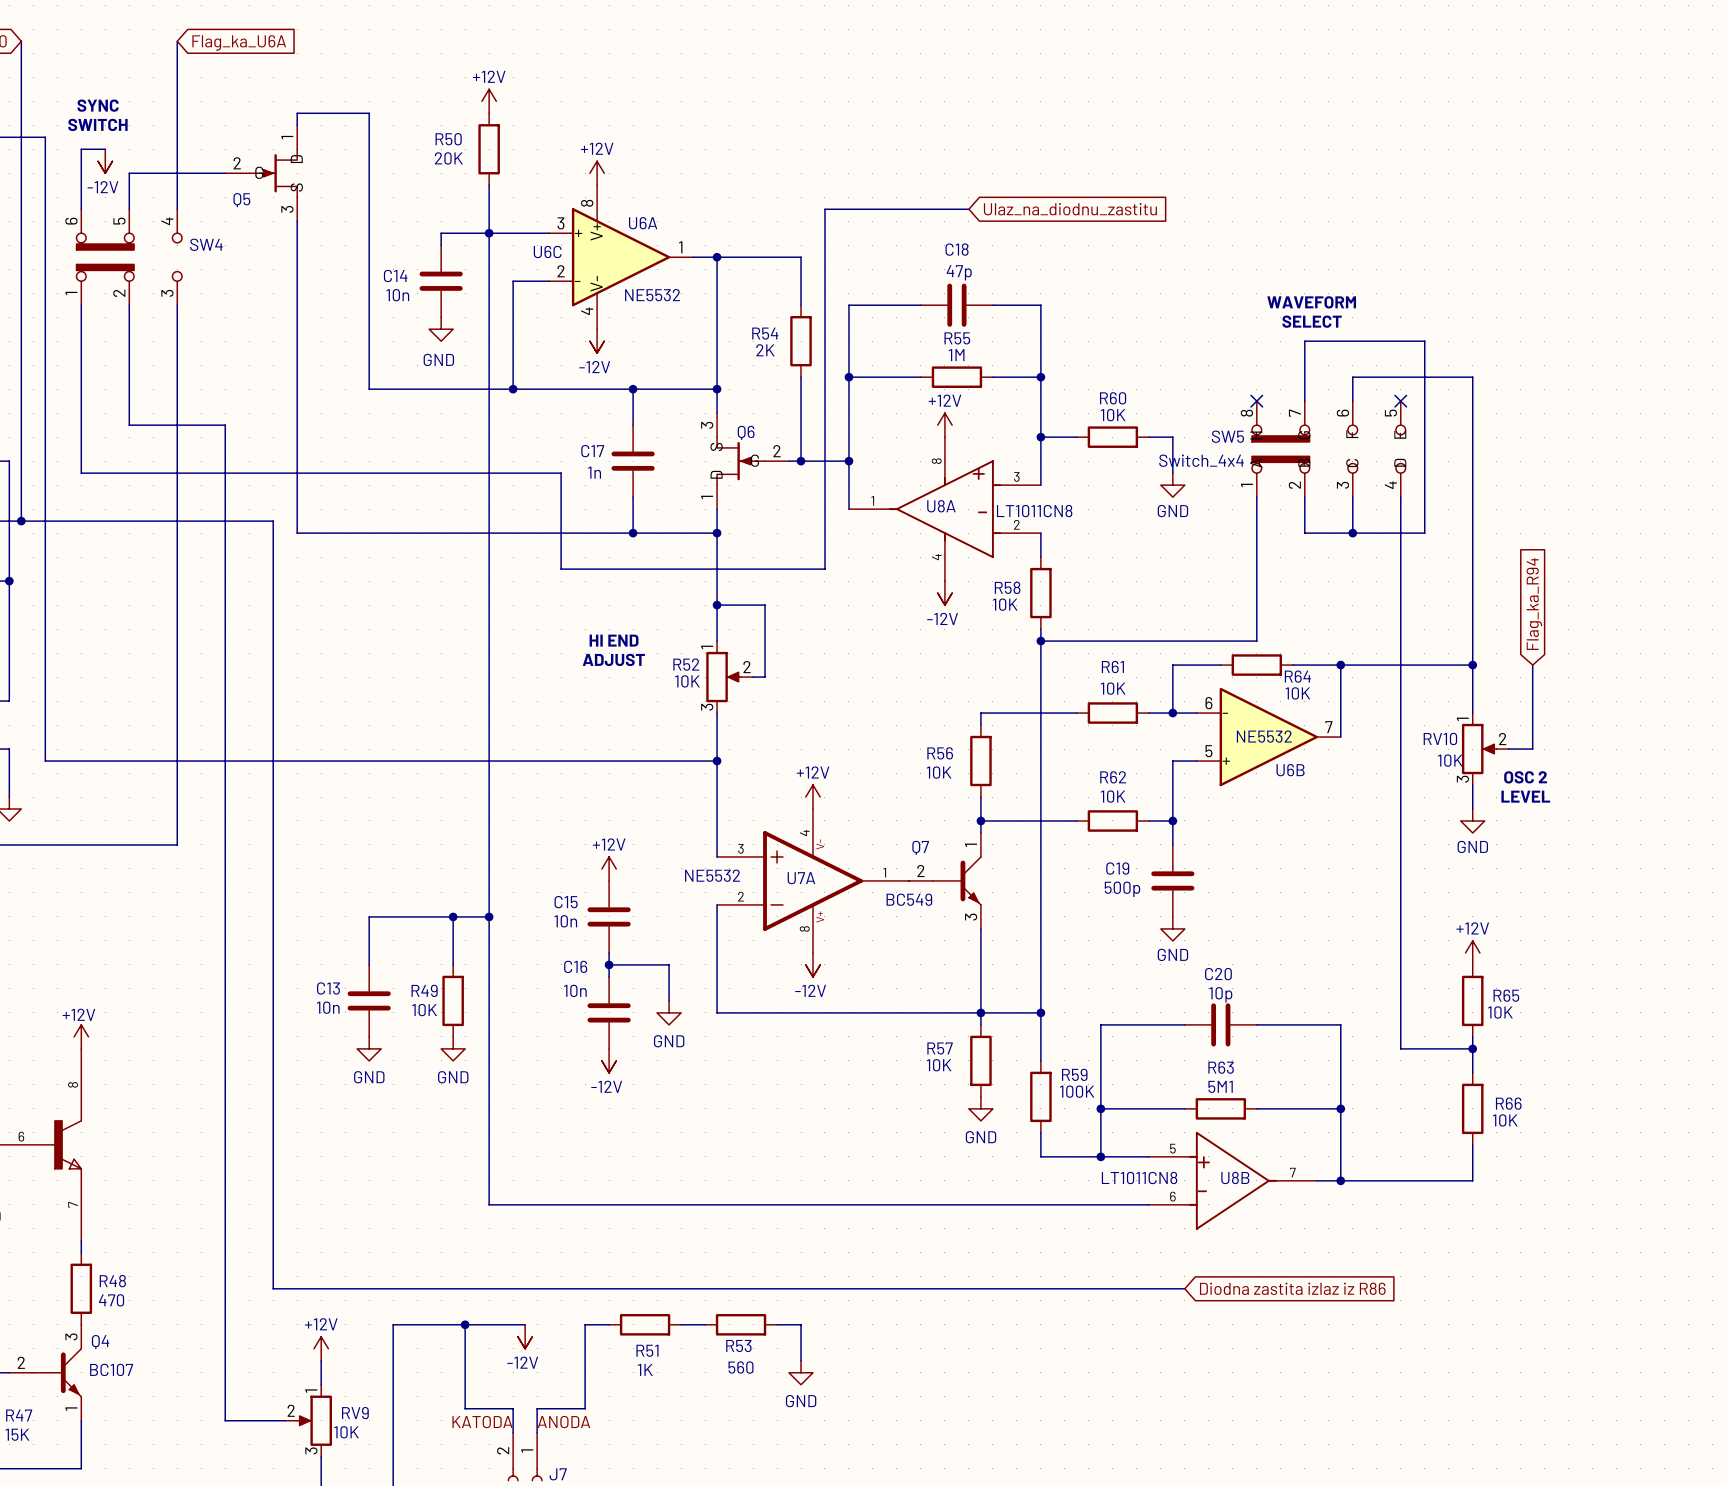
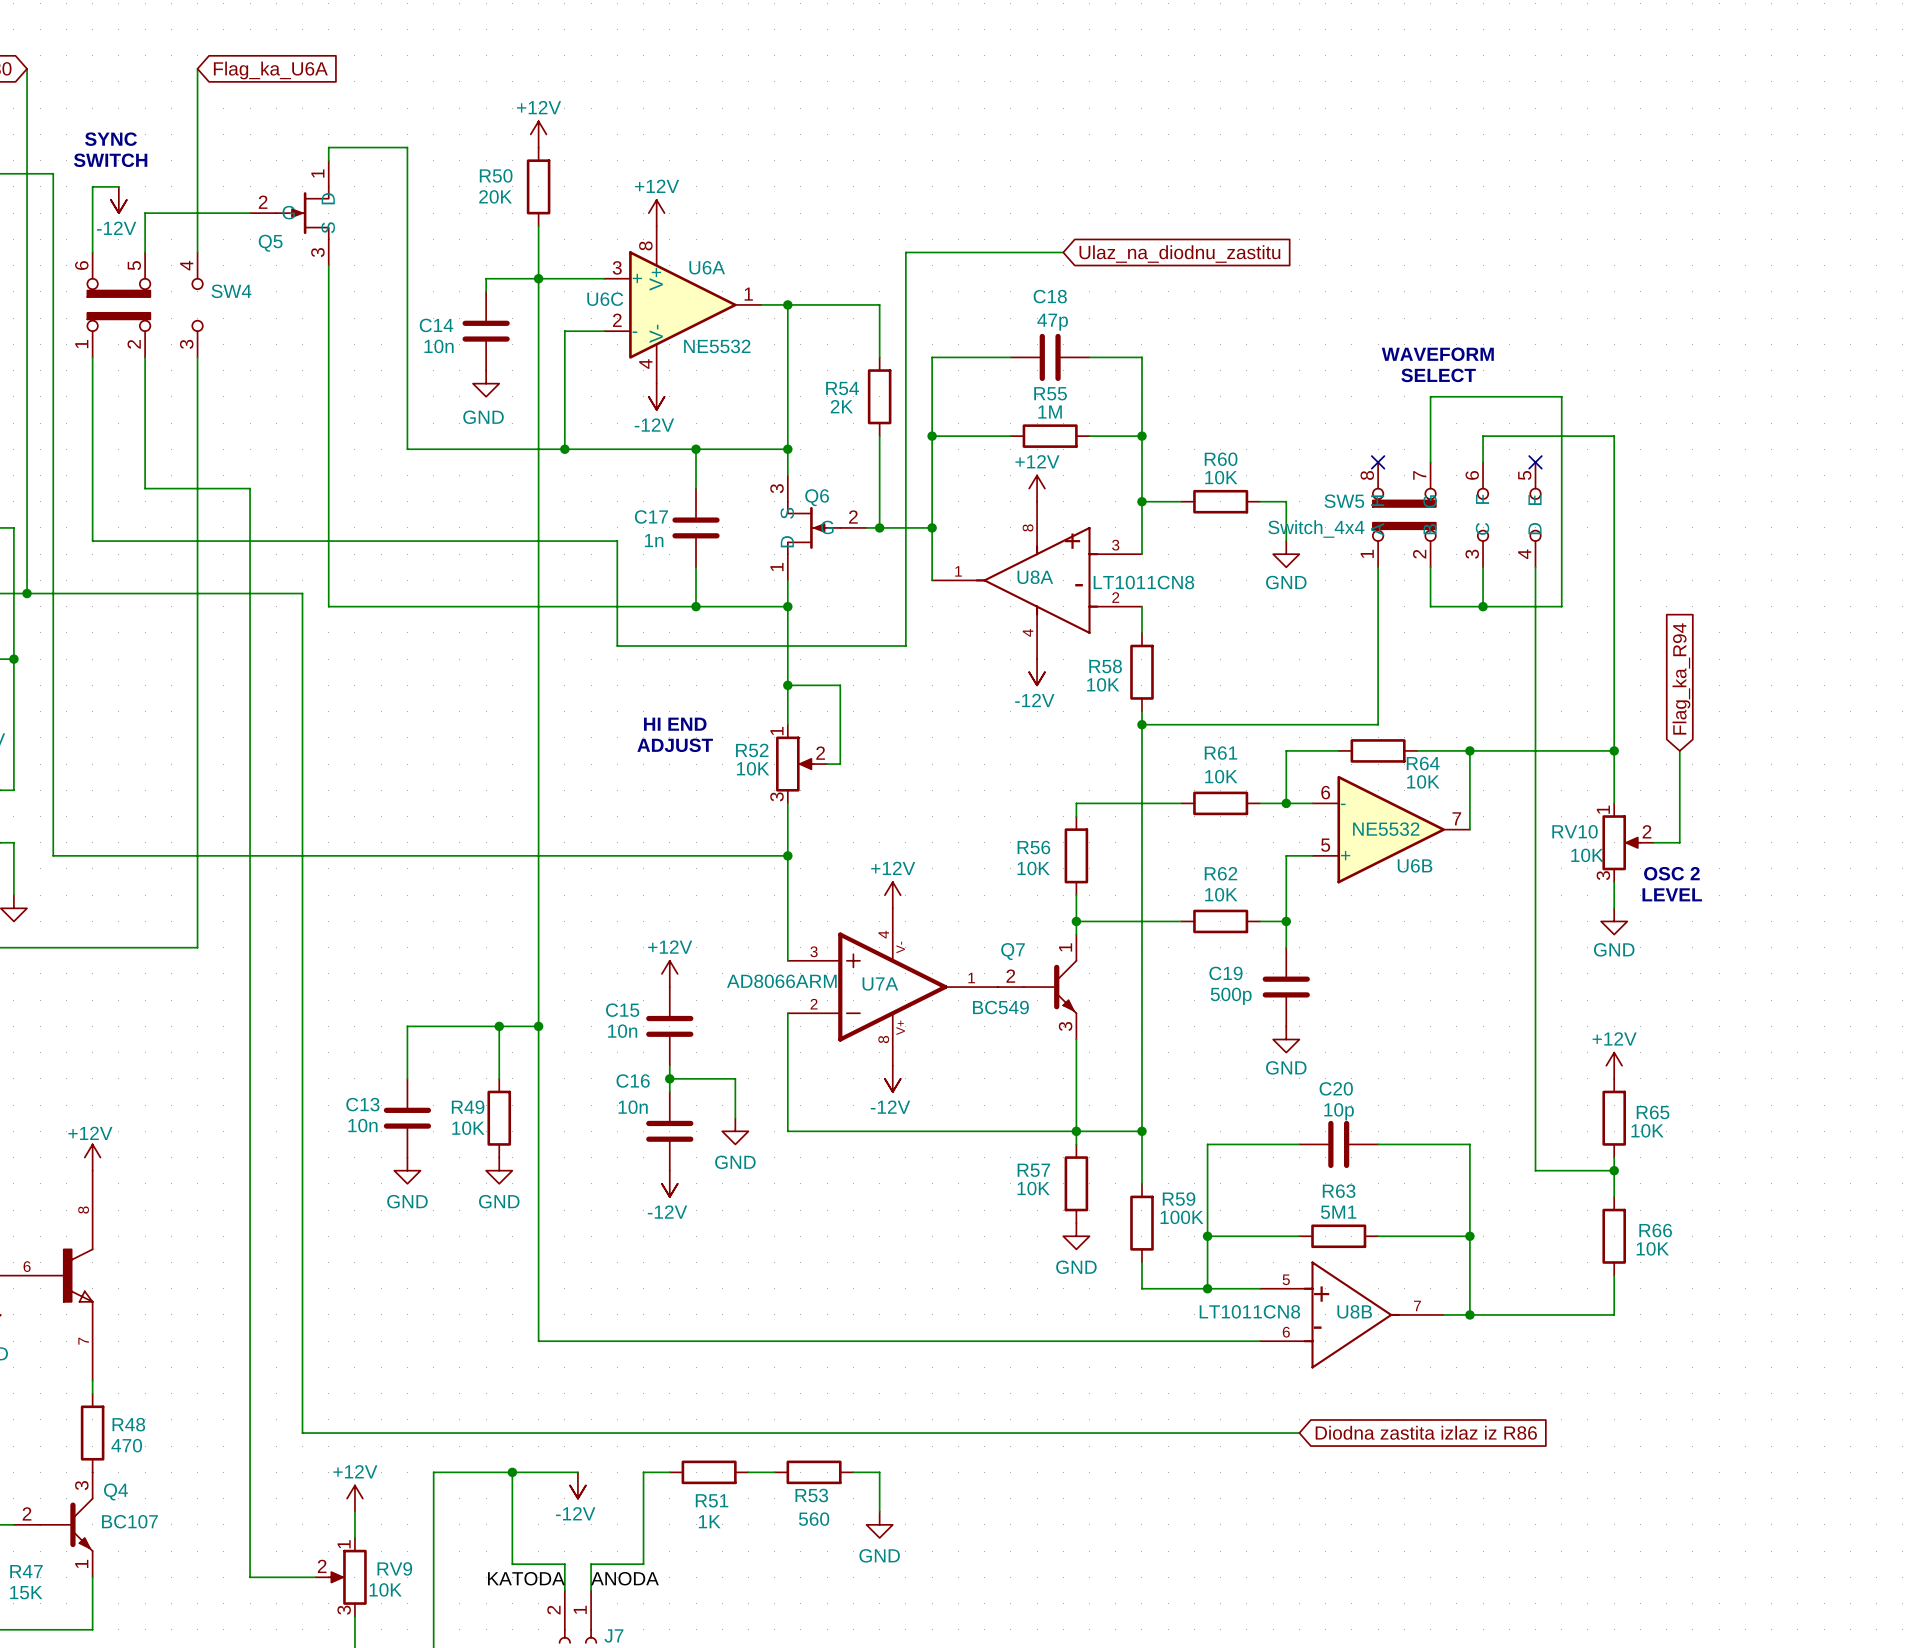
U7A value: NE5532 (712, 875) -> AD8066ARM (781, 981)

